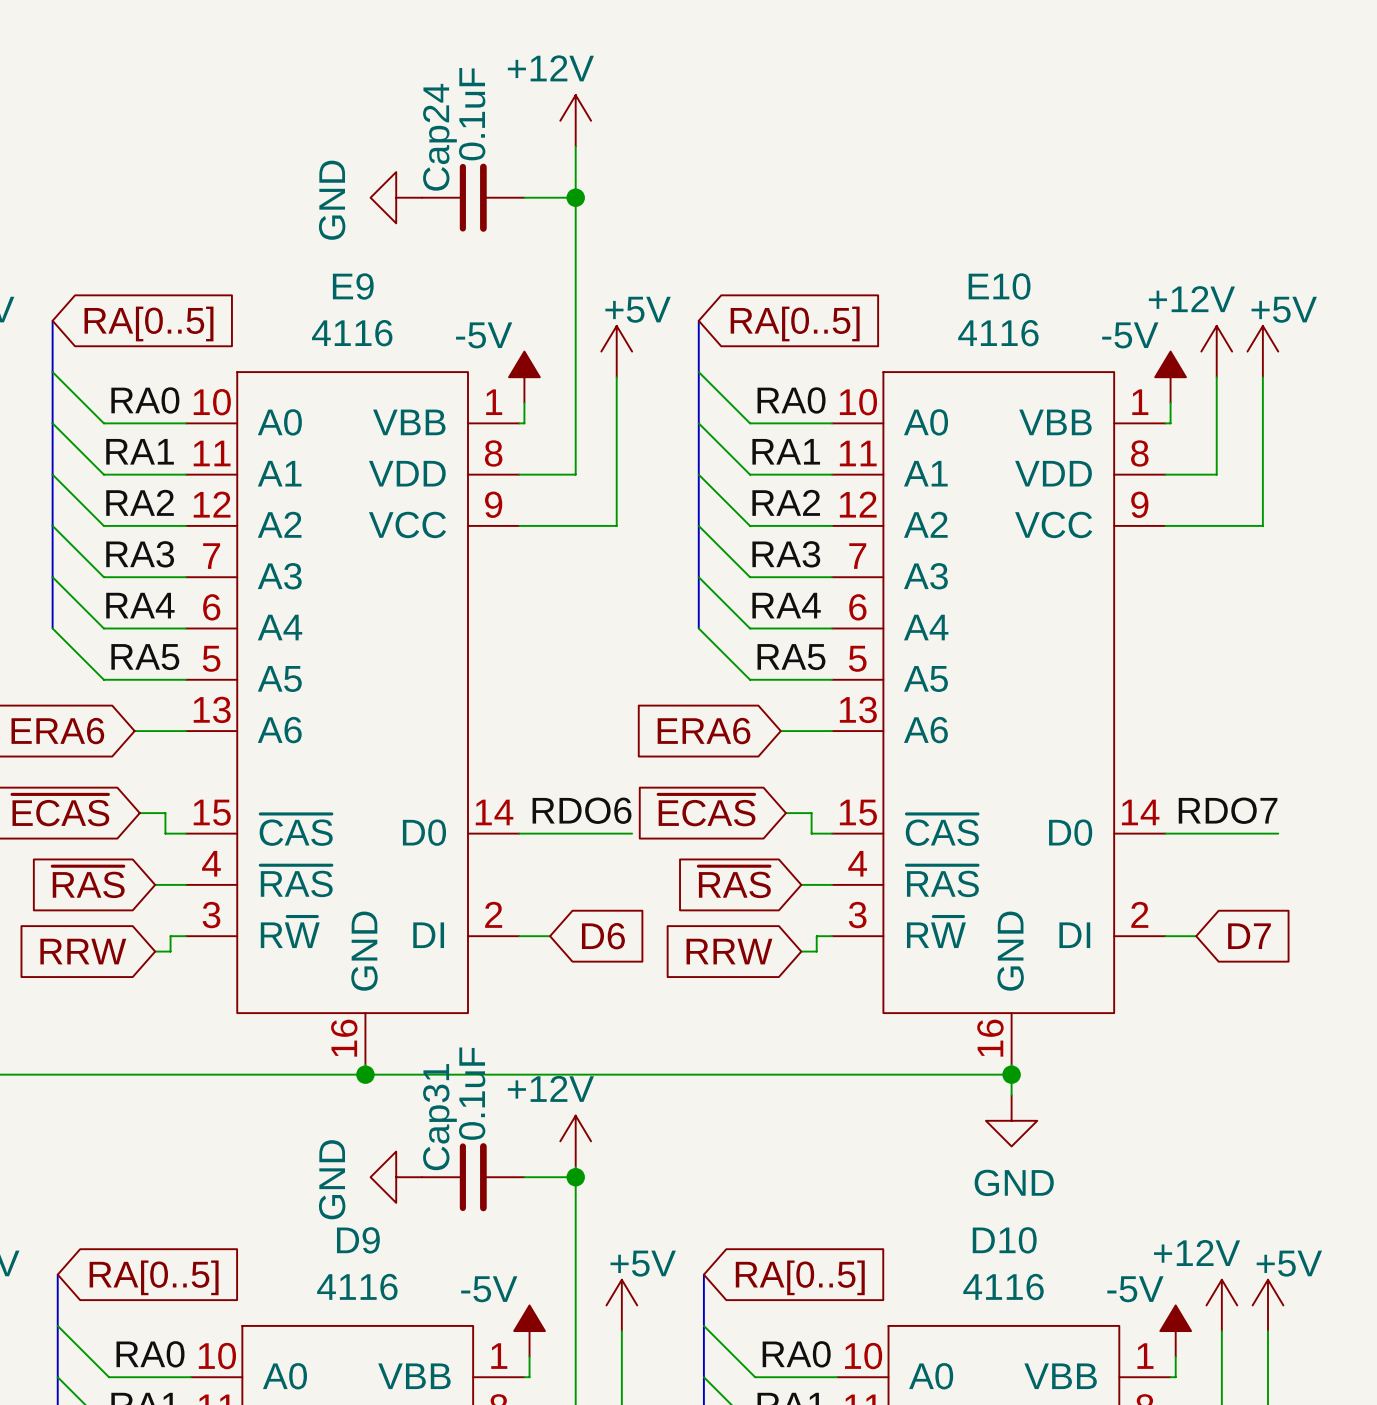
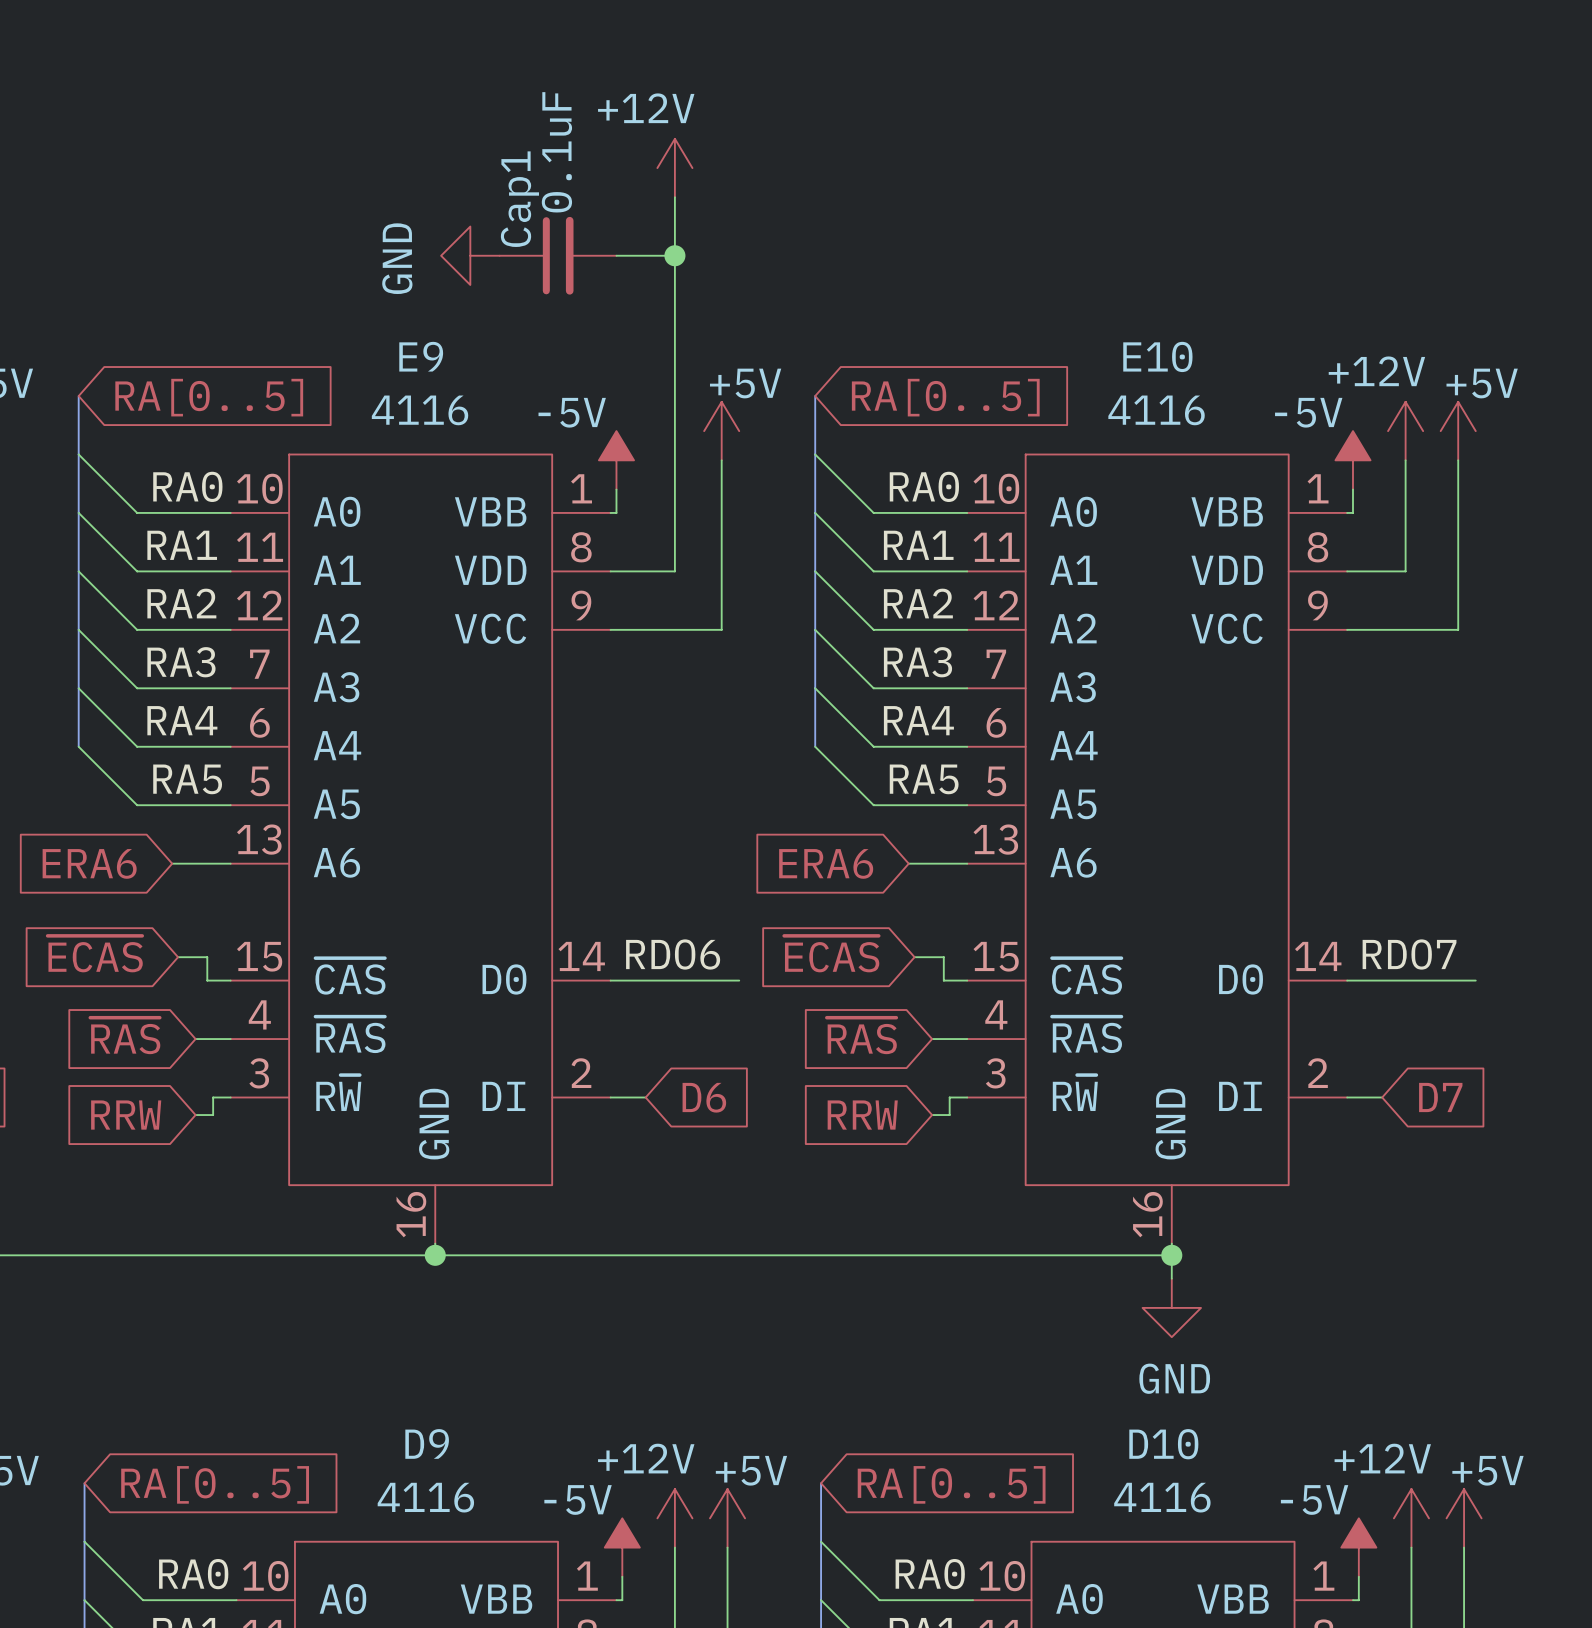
Cap24 name: Cap24 (439, 137) -> Cap1 (519, 199)
power symbol position: +12V (575, 1141) -> +12V (674, 1518)
wire: (575, 1166) (575, 1331) -> none
power symbol: GND (396, 1177) -> none
Cap31: 0.1uF (473, 1177) -> none
wire: (524, 1177) (575, 1177) -> none
junction: (575, 1177) -> none

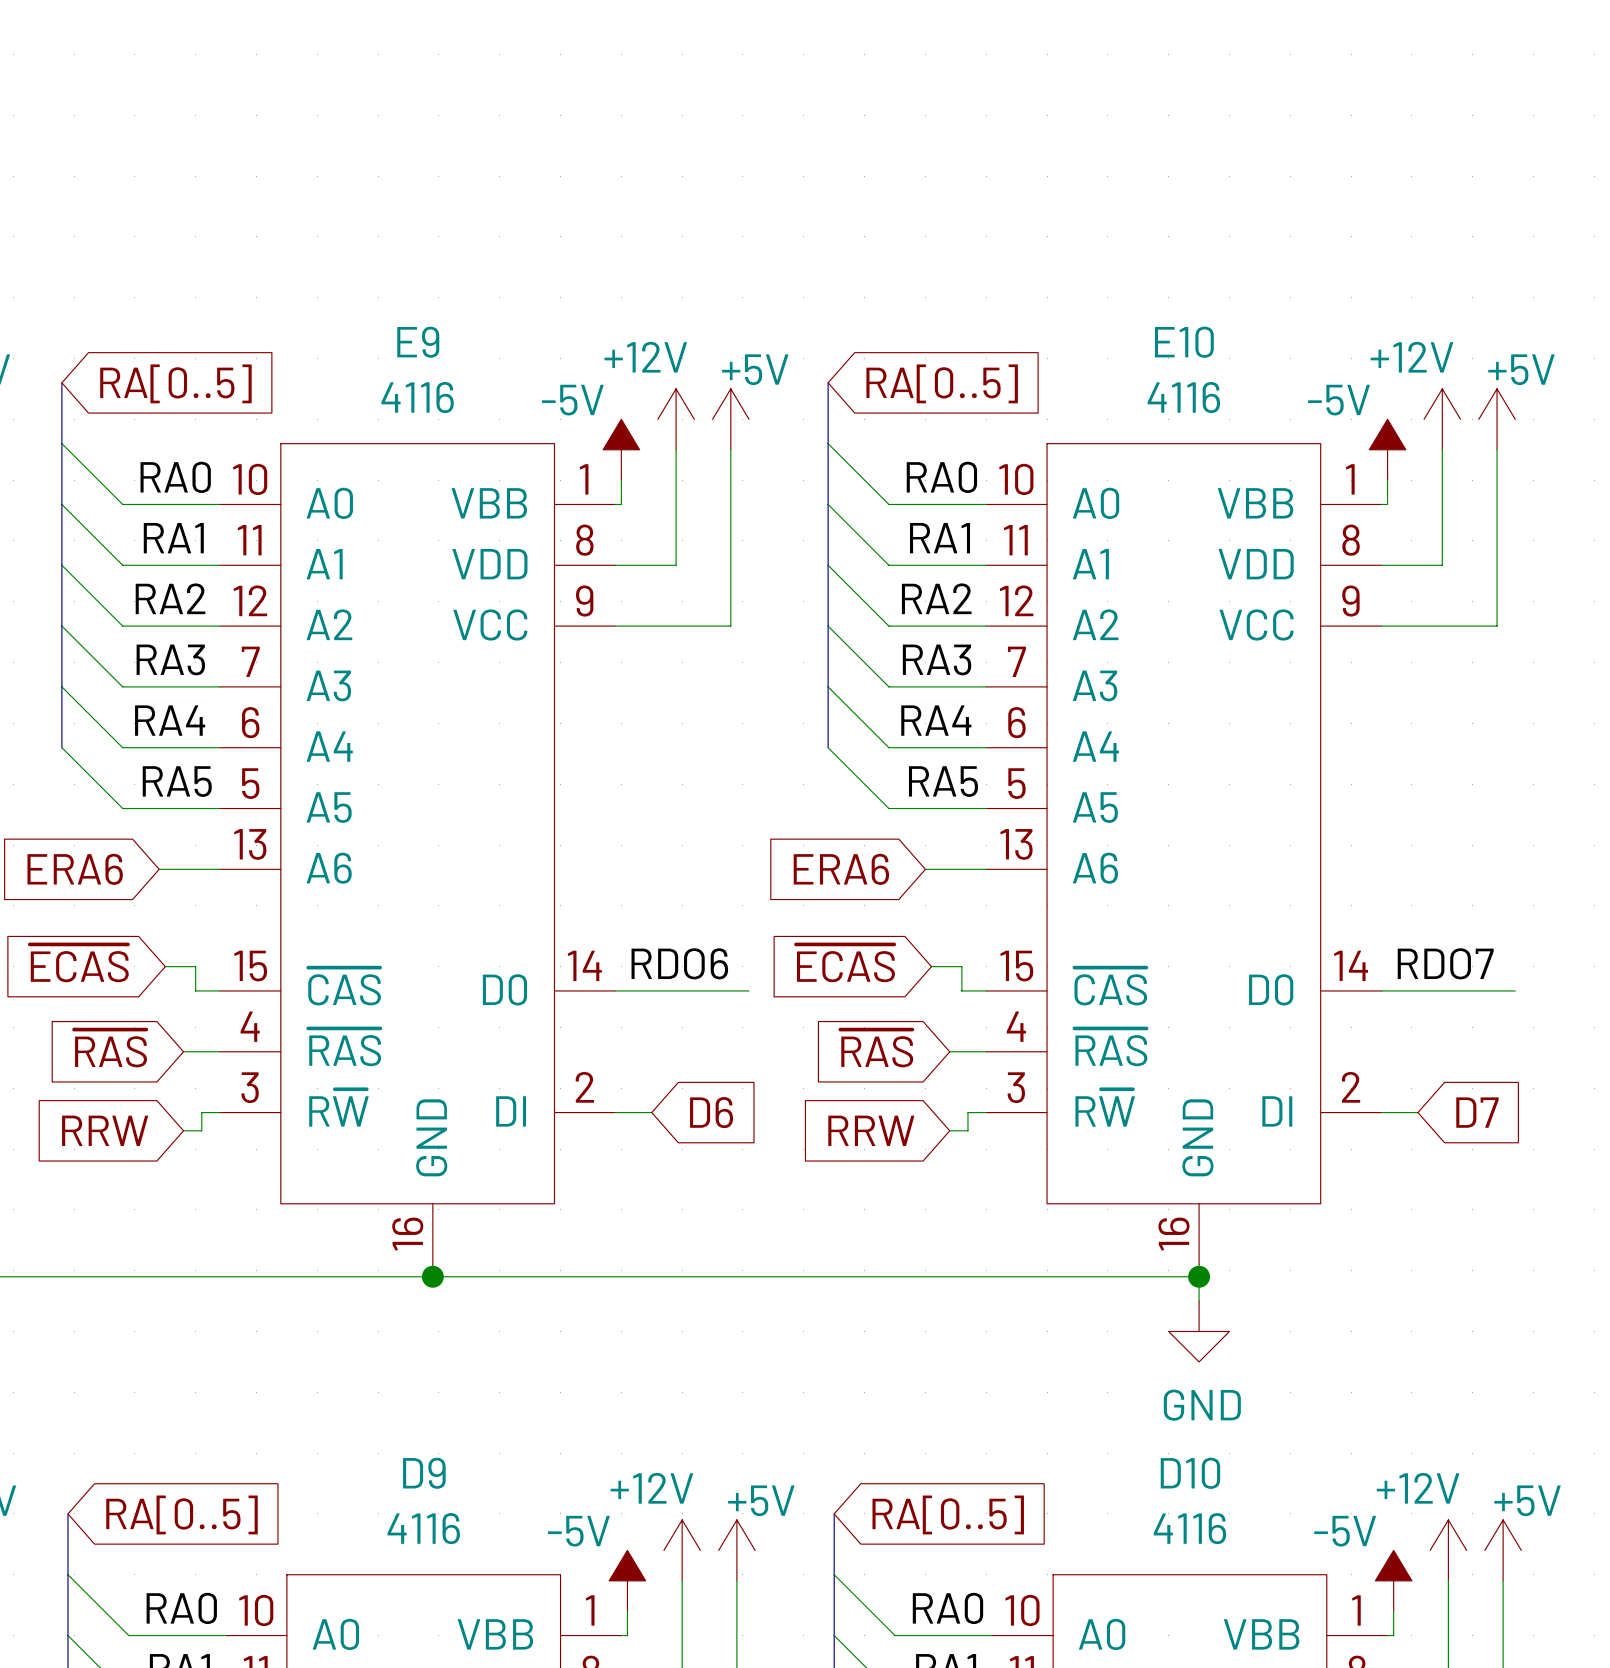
power symbol position: +12V (674, 168) -> +12V (676, 419)
wire: (674, 197) (674, 571) (669, 571) -> (676, 449) (676, 565)
power symbol: GND (470, 255) -> none
Cap1: 0.1uF (558, 255) -> none
wire: (616, 255) (674, 255) -> none
junction: (674, 255) -> none

